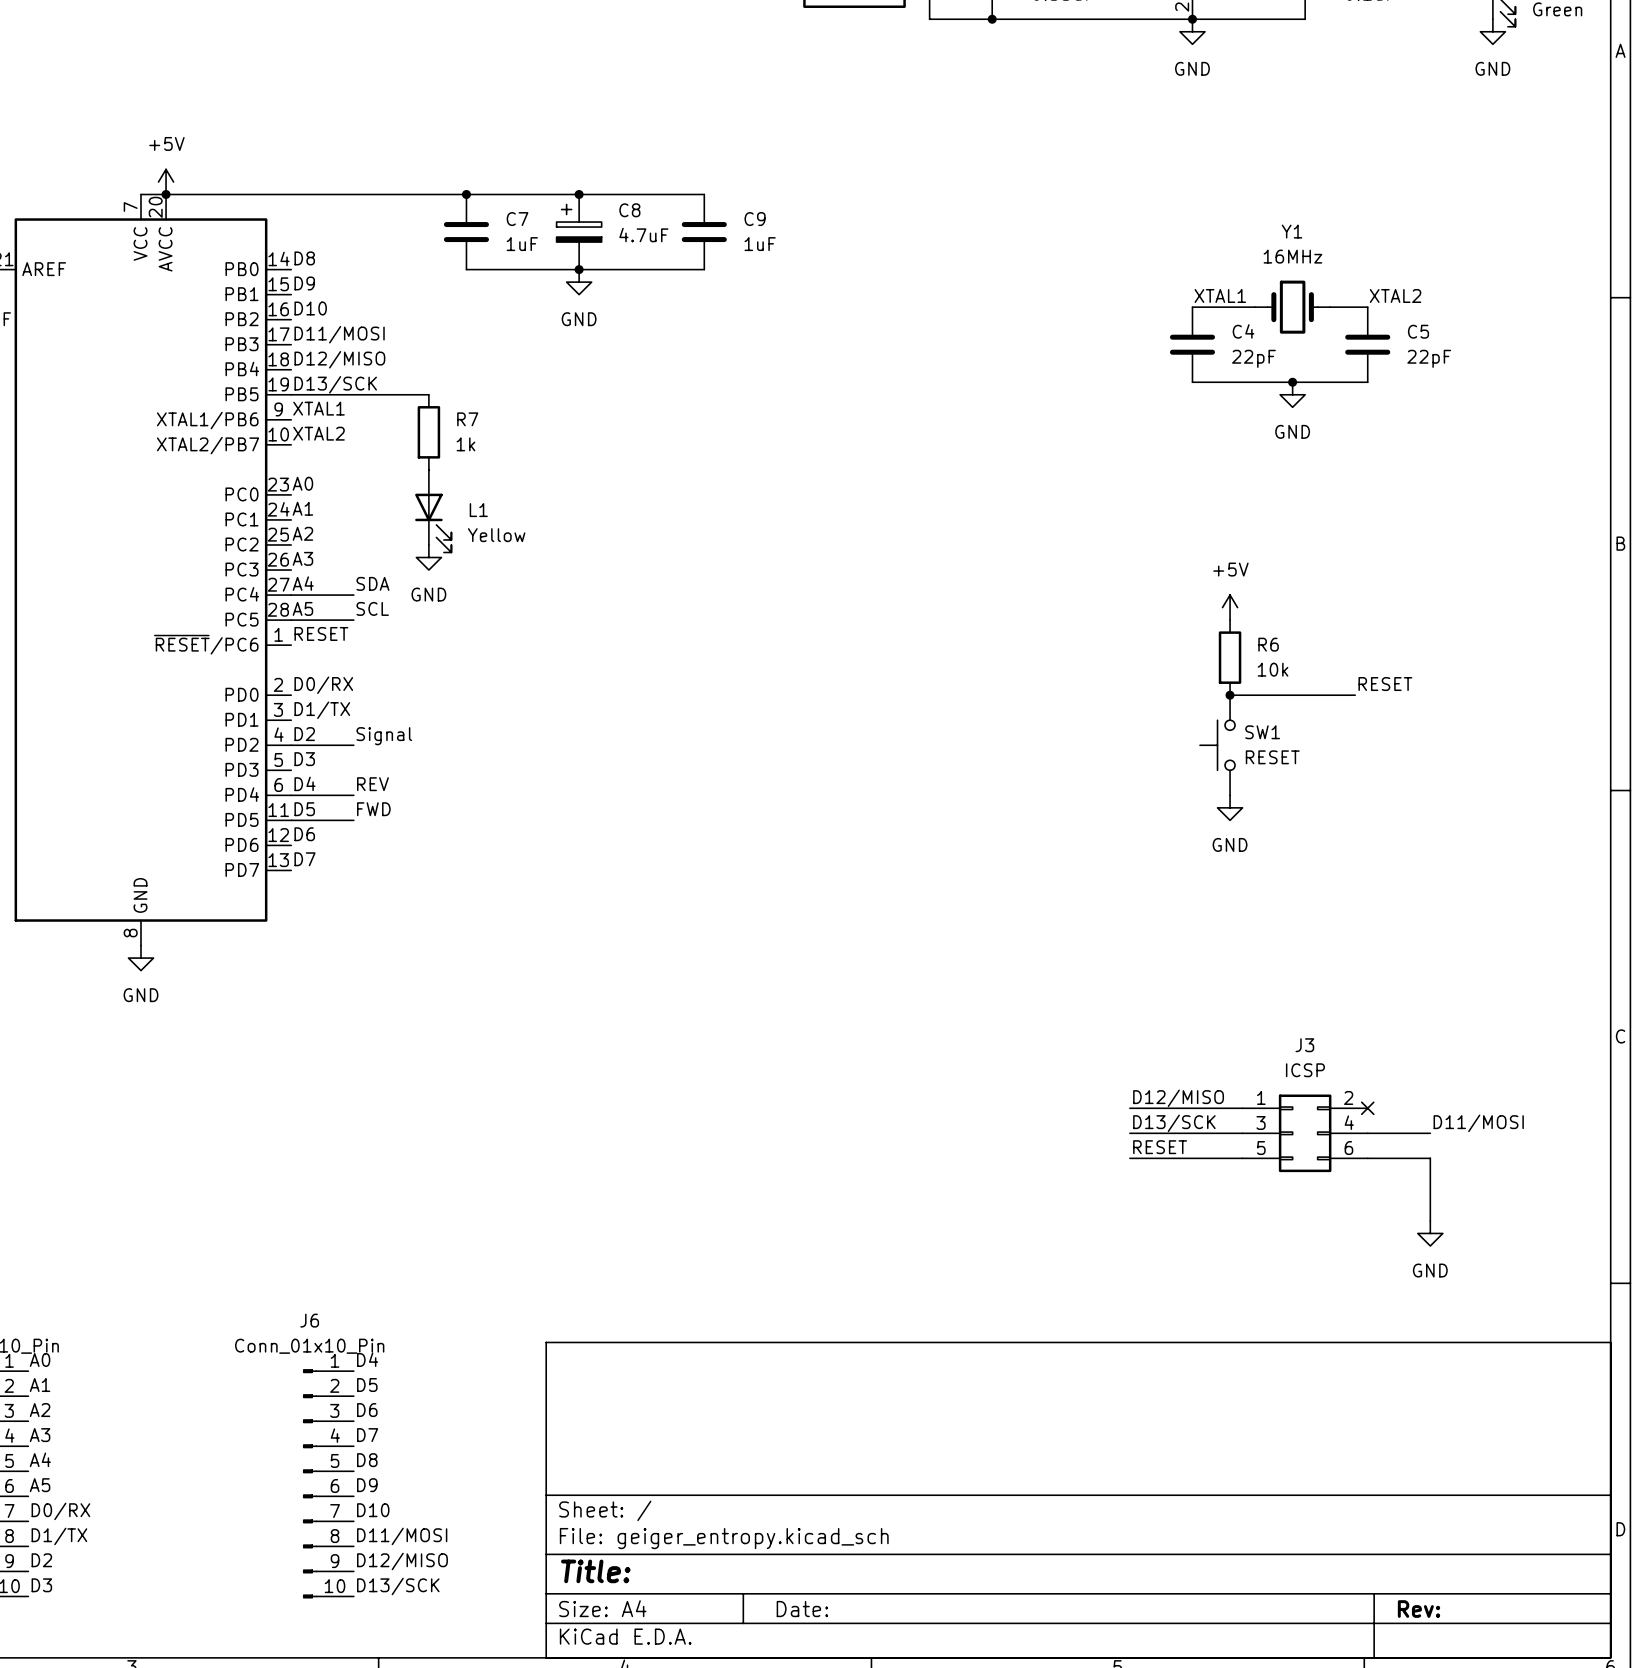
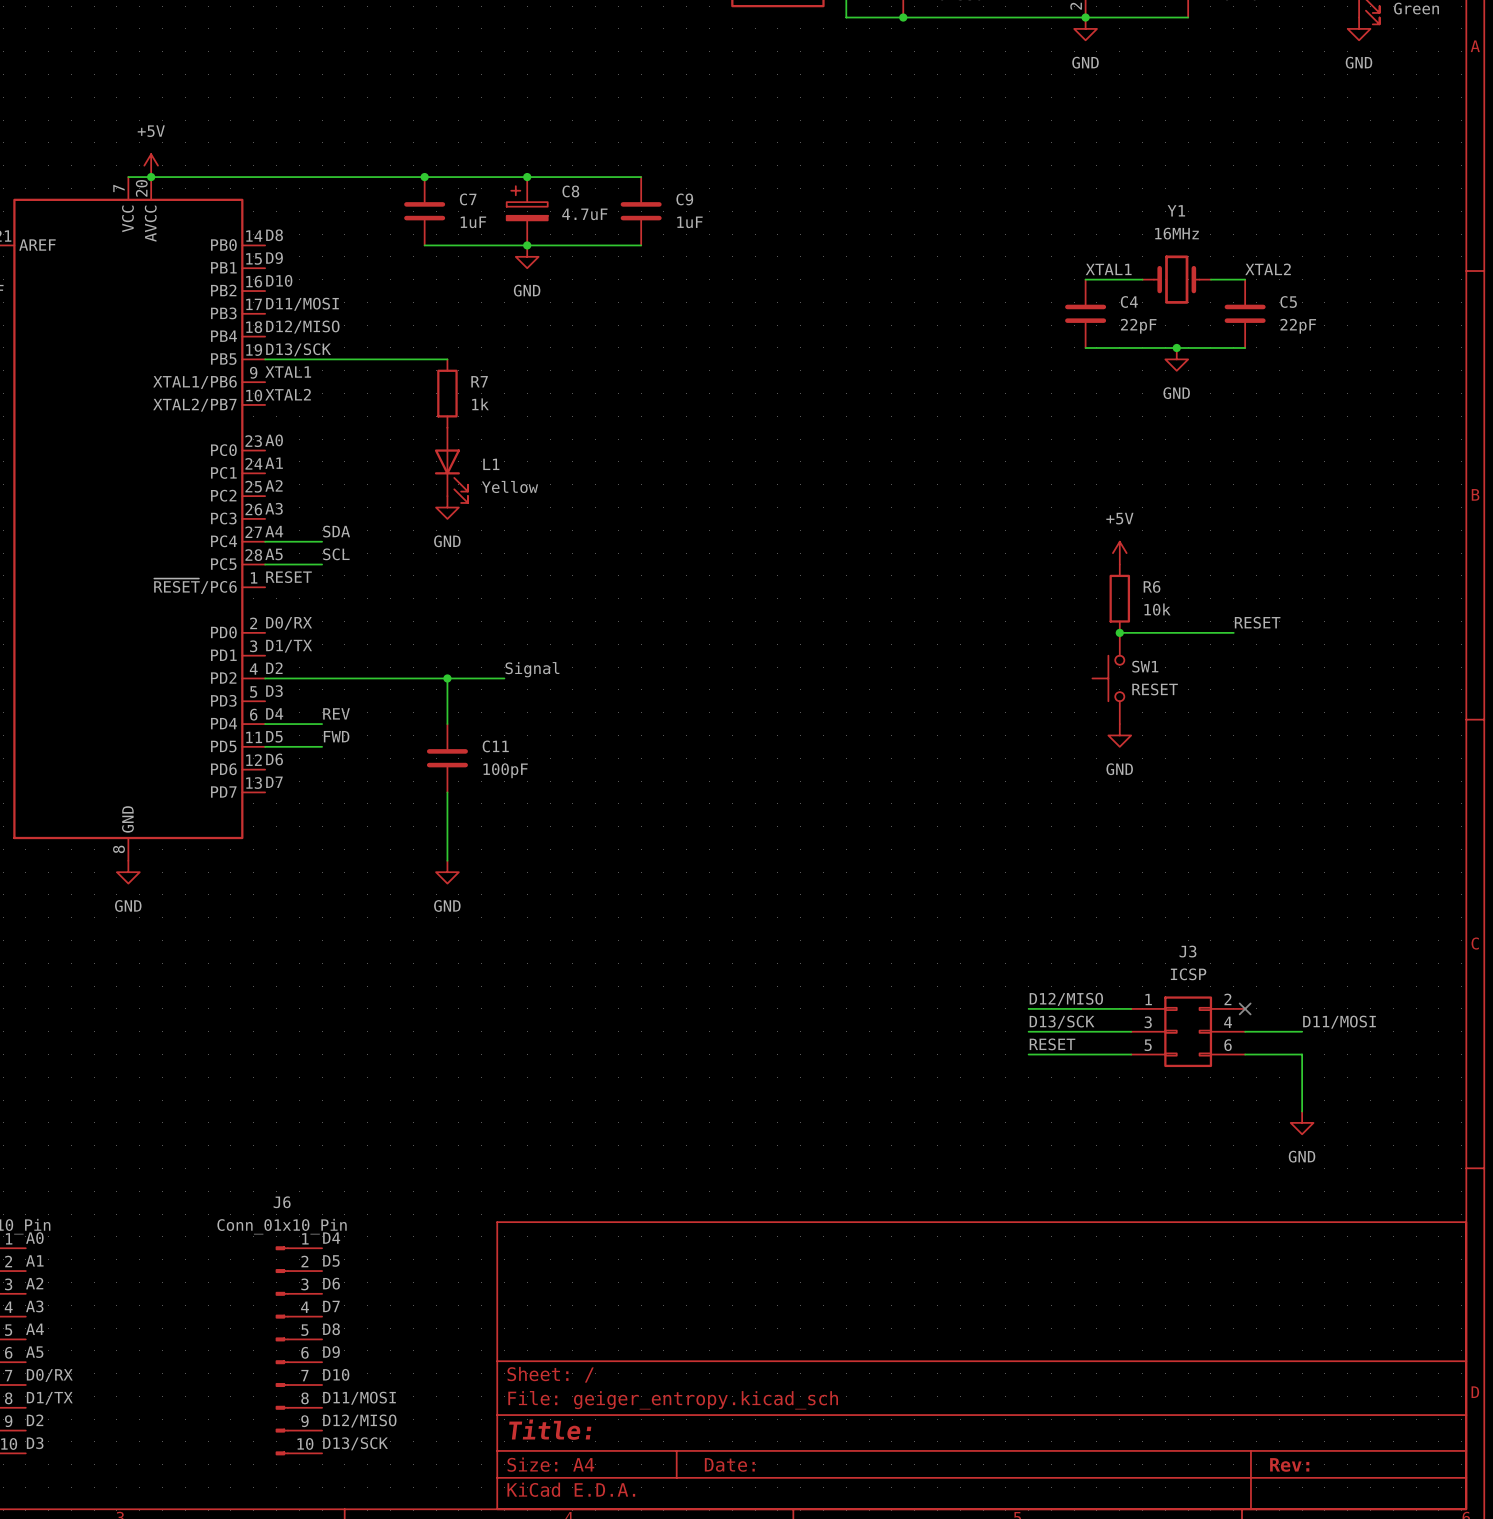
wire: none -> (390, 359) (447, 359)
R7 position: (428, 432) -> (447, 393)
L1 position: (433, 511) -> (451, 465)
power symbol position: GND (428, 557) -> GND (447, 507)
label position: Signal (384, 736) -> Signal (532, 669)
wire: none -> (322, 678) (504, 678)
wire: none -> (447, 678) (447, 724)
junction: none -> (447, 678)
C11: none -> 100pF (447, 758)
wire: none -> (447, 792) (447, 860)
power symbol: none -> GND (447, 872)

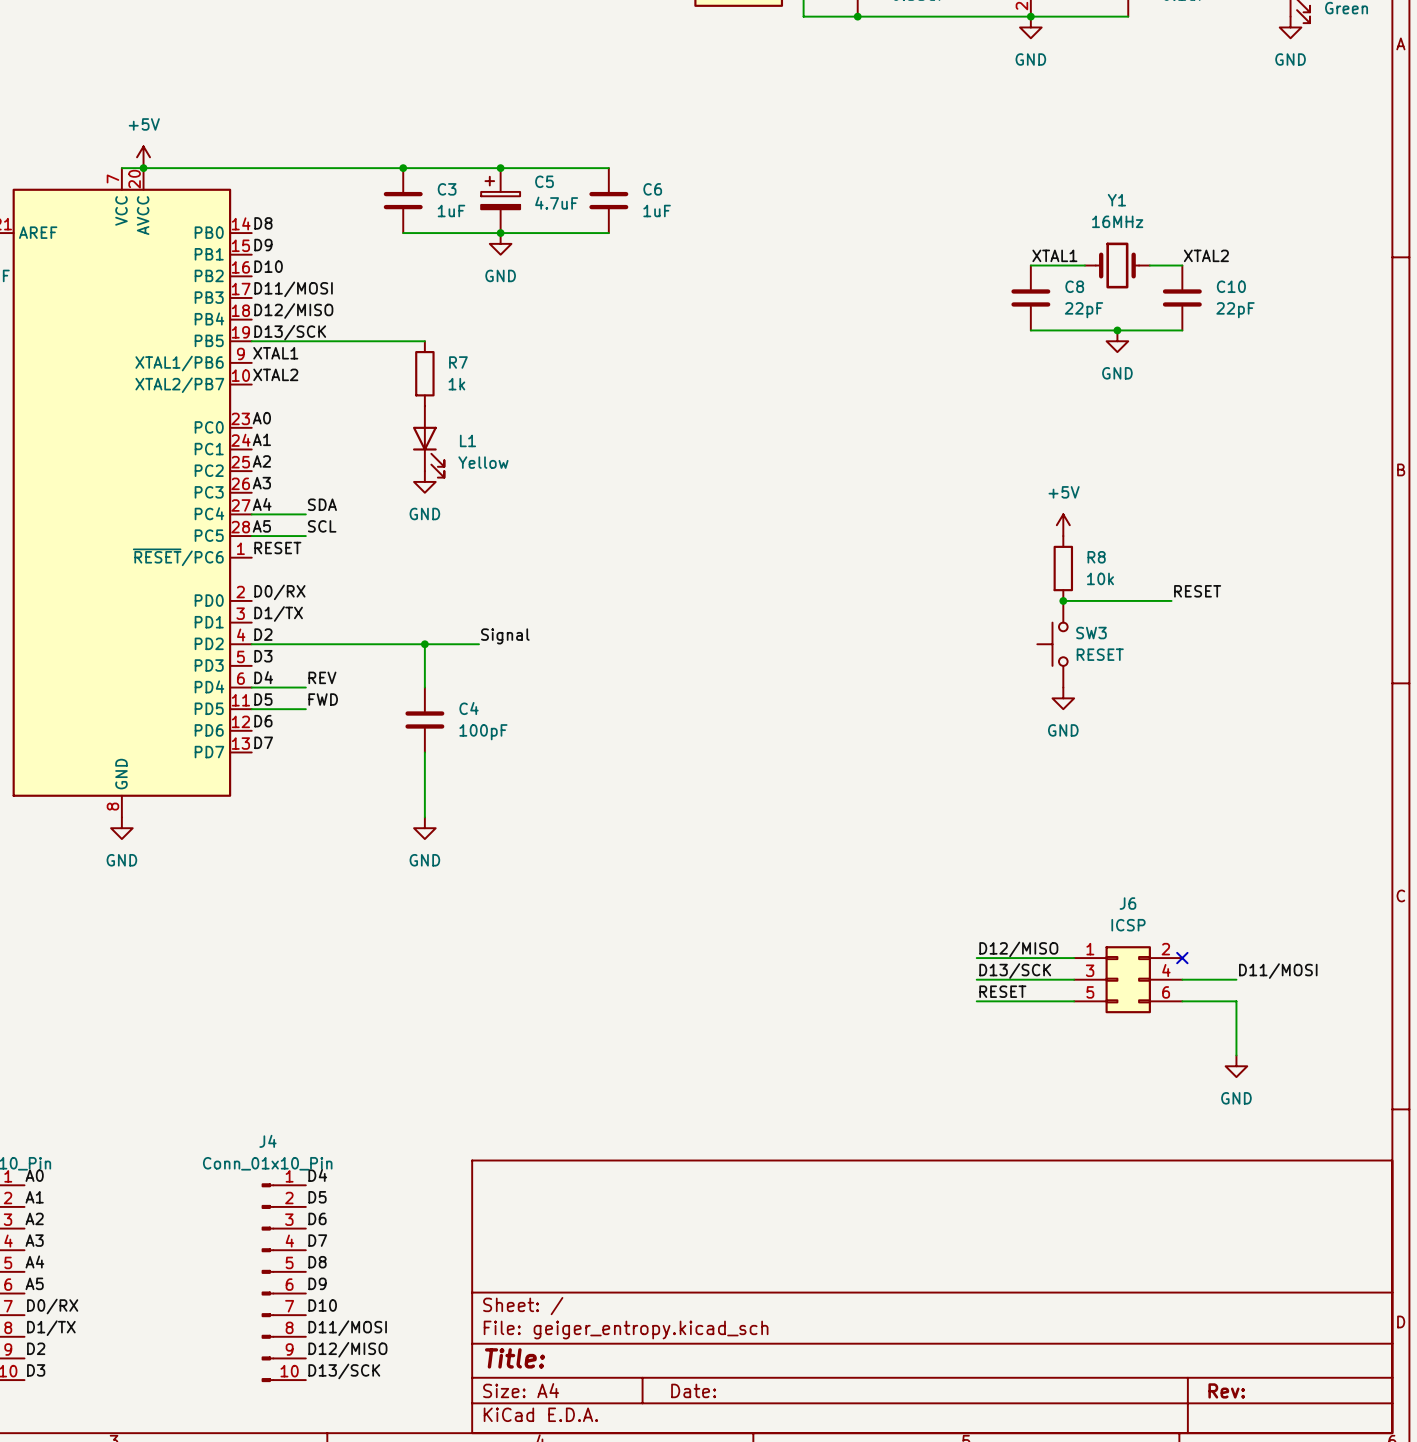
C8 name: C8 (570, 191) -> C5 (544, 181)
C7 name: C7 (468, 199) -> C3 (447, 189)
C9 name: C9 (684, 199) -> C6 (652, 189)
C4 name: C4 (1129, 301) -> C8 (1074, 286)
C5 name: C5 (1288, 301) -> C10 (1231, 286)
R6 name: R6 (1152, 586) -> R8 (1096, 557)
SW1 name: SW1 (1145, 666) -> SW3 (1091, 633)
C11 name: C11 (495, 746) -> C4 (469, 708)
J3 name: J3 (1187, 951) -> J6 (1127, 903)
J6 name: J6 (282, 1202) -> J4 (267, 1141)

